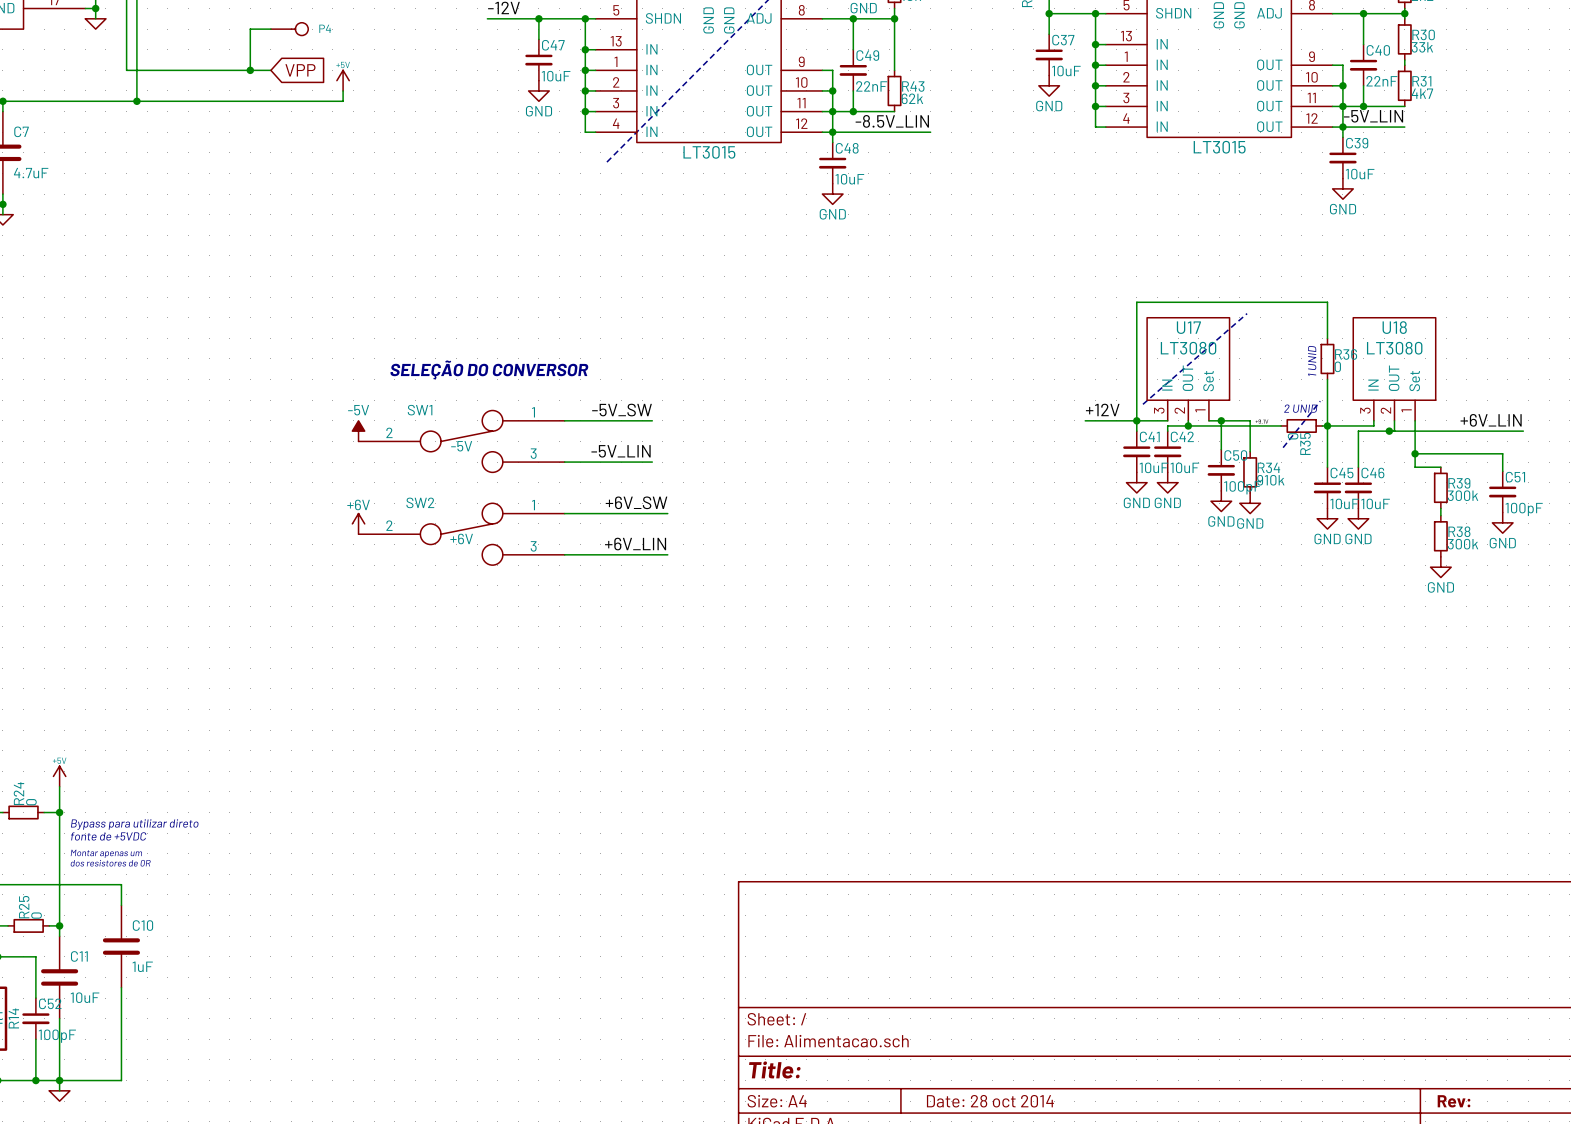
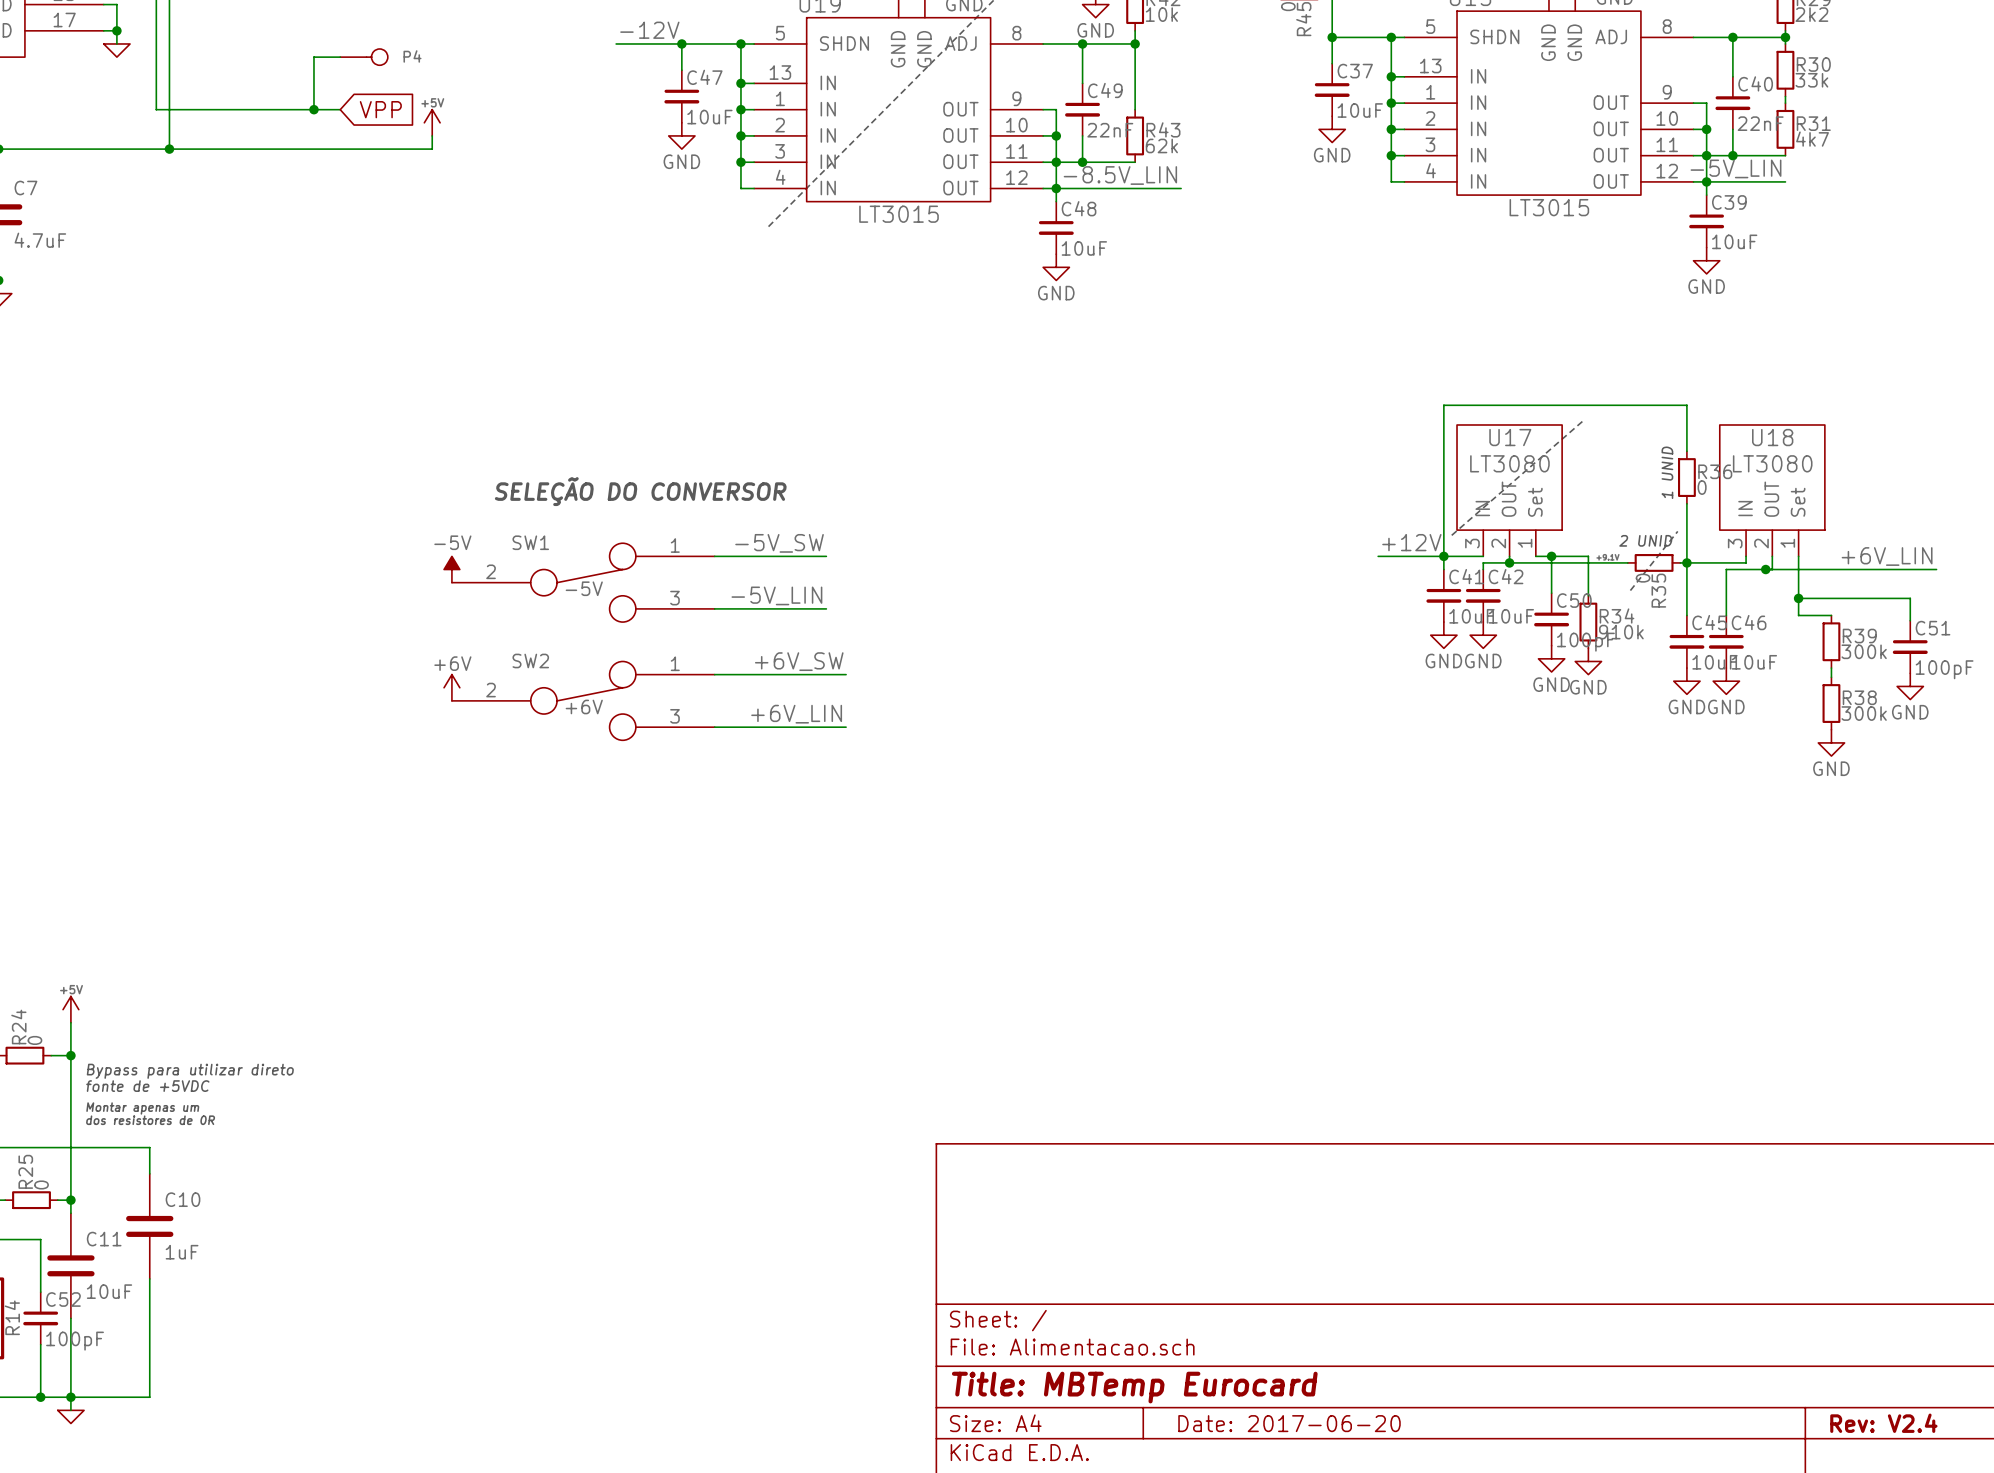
title block: Title: (774, 1069) -> Title: MBTemp Eurocard (1134, 1387)
title block: Date: 28 oct 2014 (990, 1101) -> Date: 2017-06-20 (1289, 1423)
title block: Rev: (1454, 1101) -> Rev: V2.4 (1883, 1423)

